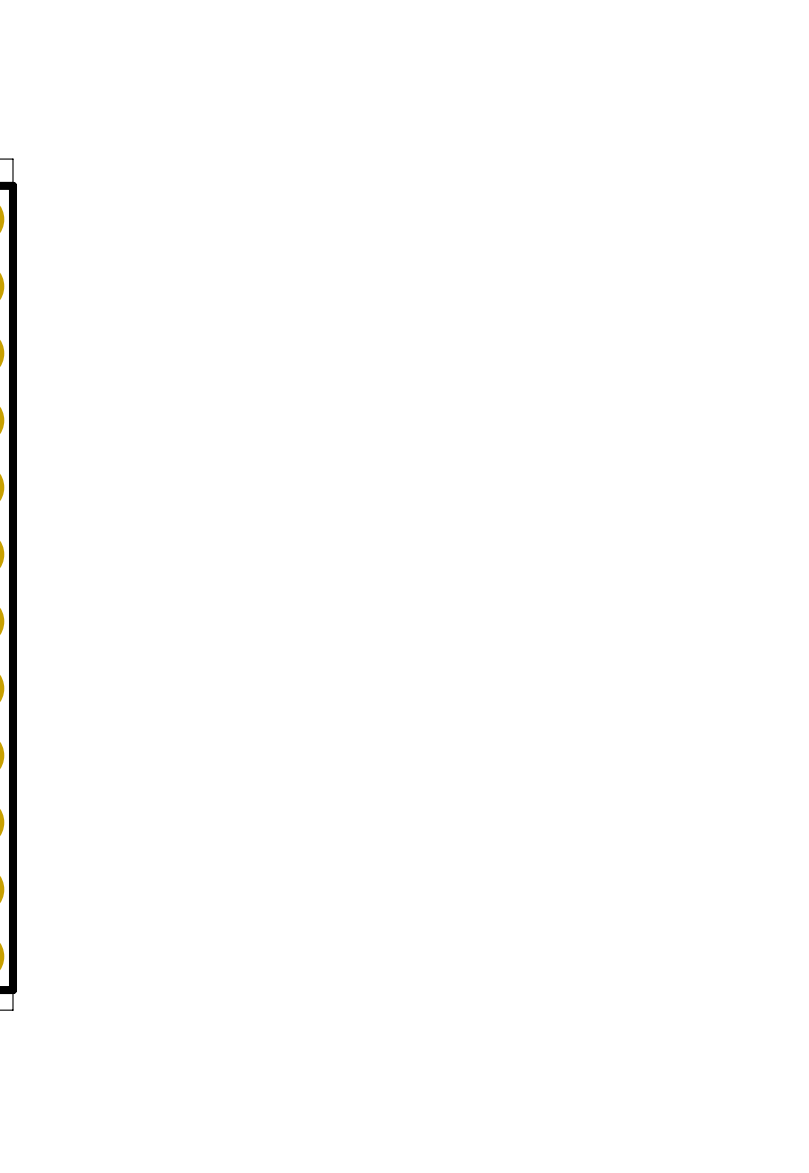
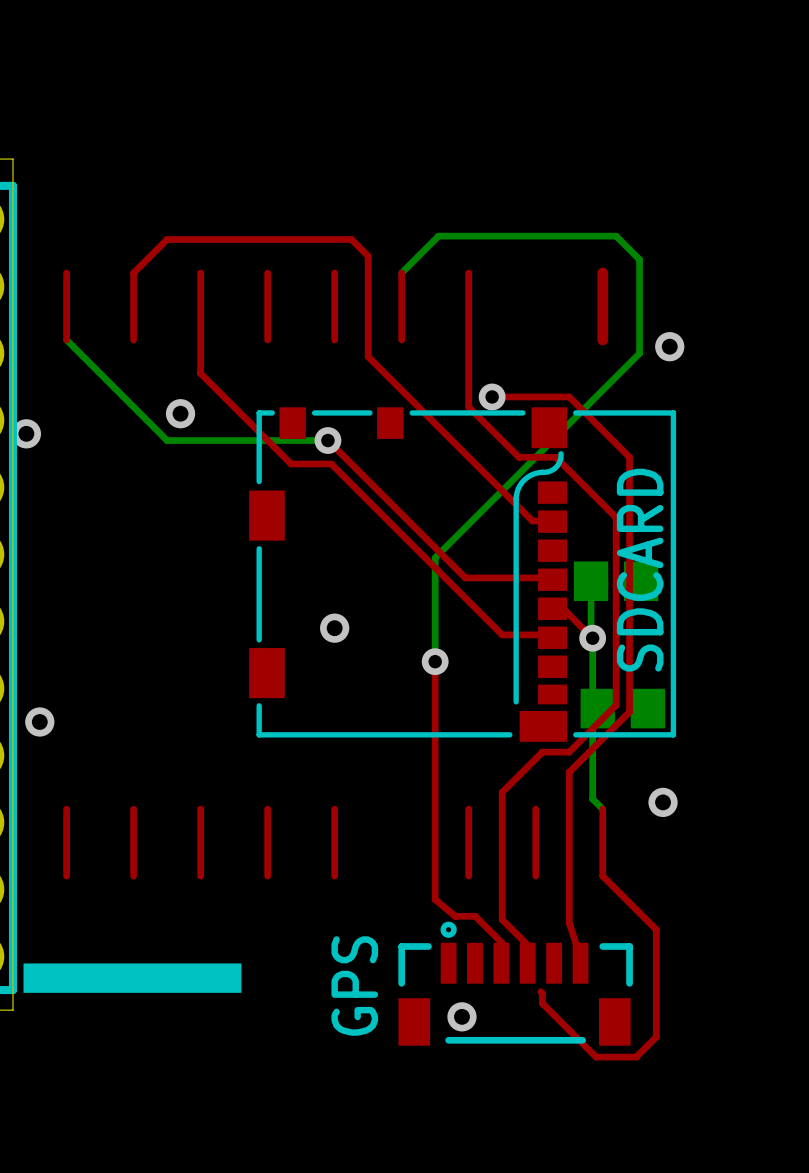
top track: none -> (66, 272) (66, 340)
top track: none -> (200, 272) (200, 373) (291, 463) (331, 463) (502, 634) (552, 634) (552, 637)
top track: none -> (267, 272) (267, 340)
top track: none -> (334, 272) (334, 340)
bottom track: none -> (401, 272) (438, 236) (616, 236) (639, 259) (639, 353) (435, 557) (435, 661)
top track: none -> (401, 272) (401, 340)
top track: none -> (468, 272) (468, 407) (518, 457) (555, 457) (616, 517) (616, 705) (569, 752) (542, 752) (502, 792) (502, 919) (529, 946) (527, 963)
top track: none -> (602, 272) (602, 340)
bottom track: none -> (66, 340) (167, 440) (327, 440)
top track: none -> (133, 340) (133, 272) (167, 239) (351, 239) (368, 256) (368, 356) (532, 520) (552, 521)
via: none -> (669, 346)
top track: none -> (492, 396) (569, 396) (629, 457) (629, 711) (569, 772) (569, 923) (582, 963) (580, 963)
via: none -> (492, 396)
via: none -> (180, 413)
via: none -> (26, 433)
top track: none -> (327, 440) (465, 577) (552, 577) (552, 579)
via: none -> (327, 440)
SDCARD: none -> (462, 574)
bottom track: none -> (591, 581) (592, 799) (602, 809)
part: none -> (616, 581)
top track: none -> (552, 608) (555, 611) (565, 611) (592, 638)
via: none -> (334, 628)
via: none -> (592, 638)
top track: none -> (435, 661) (435, 899) (455, 916) (475, 916) (502, 943) (501, 963)
via: none -> (435, 661)
part: none -> (622, 708)
via: none -> (39, 721)
via: none -> (663, 802)
top track: none -> (66, 809) (66, 876)
top track: none -> (133, 809) (133, 876)
top track: none -> (200, 809) (200, 876)
top track: none -> (267, 809) (267, 876)
top track: none -> (334, 809) (334, 876)
top track: none -> (468, 809) (468, 876)
top track: none -> (535, 809) (535, 876)
top track: none -> (602, 809) (602, 876) (656, 929) (656, 1036) (636, 1057) (596, 1057) (542, 1003) (540, 991)
drawing: none -> [23, 963, 242, 993]
GPS: none -> (515, 983)
via: none -> (461, 1016)

